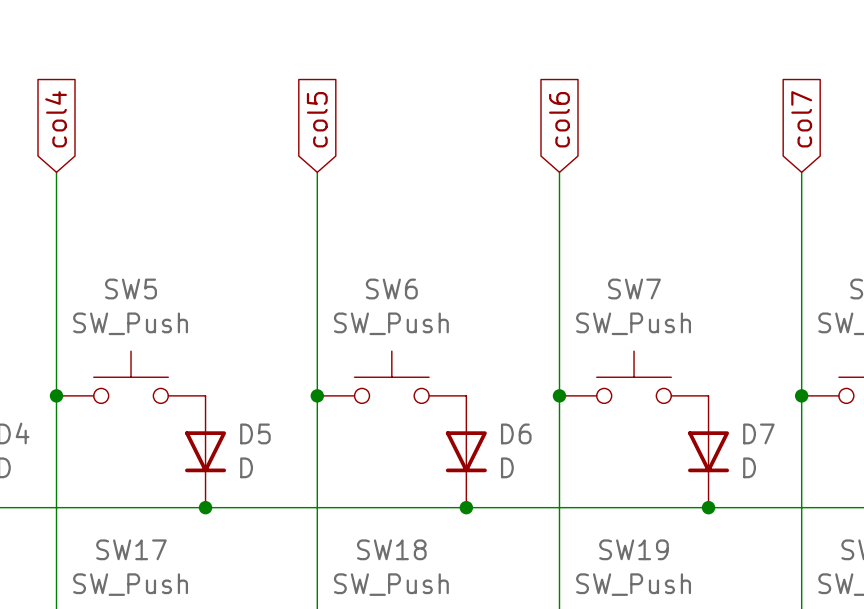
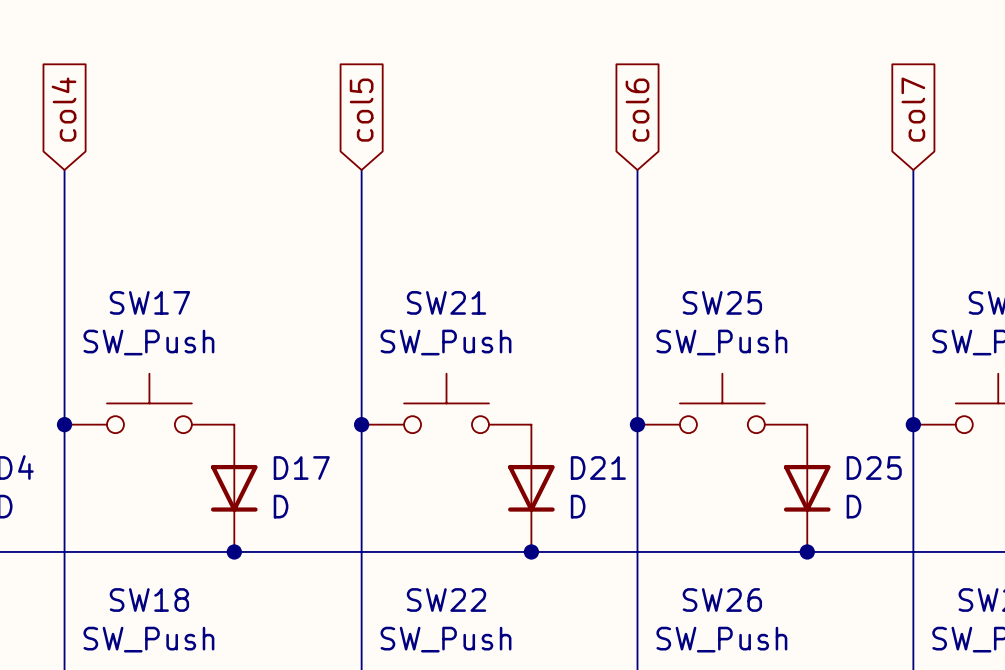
SW5 name: SW5 (131, 289) -> SW17 (149, 302)
SW6 name: SW6 (391, 289) -> SW21 (446, 302)
SW7 name: SW7 (634, 289) -> SW25 (722, 302)
D5 name: D5 (255, 433) -> D17 (301, 468)
D6 name: D6 (516, 433) -> D21 (598, 468)
D7 name: D7 (758, 433) -> D25 (874, 468)
SW17 name: SW17 (131, 549) -> SW18 (149, 599)
SW18 name: SW18 (391, 549) -> SW22 (446, 599)
SW19 name: SW19 (634, 549) -> SW26 (722, 599)

